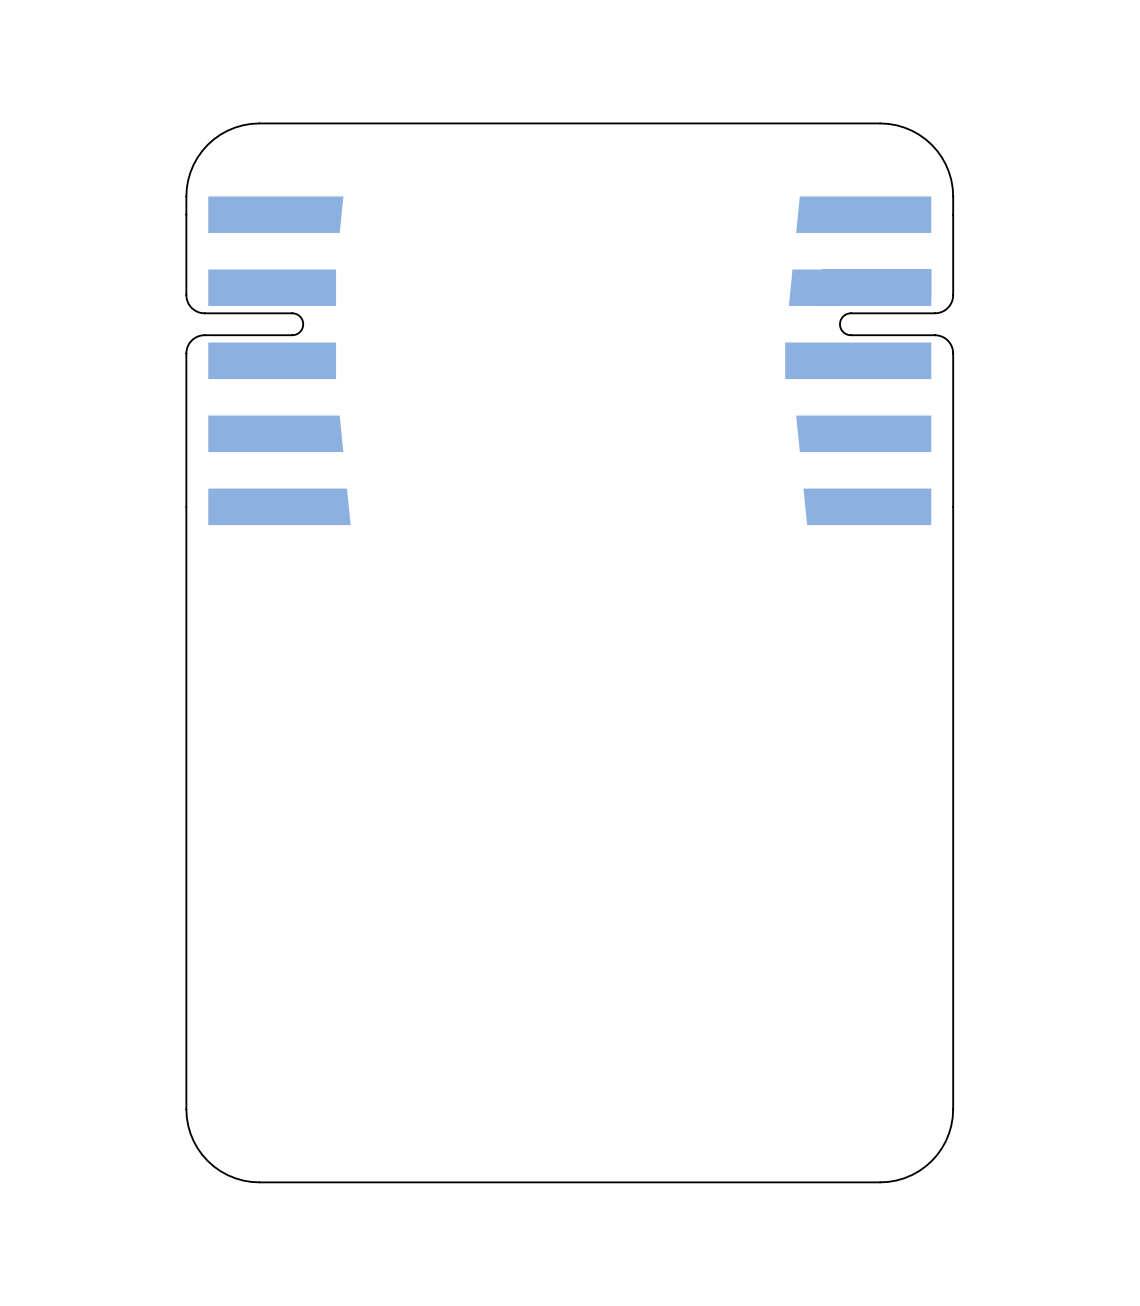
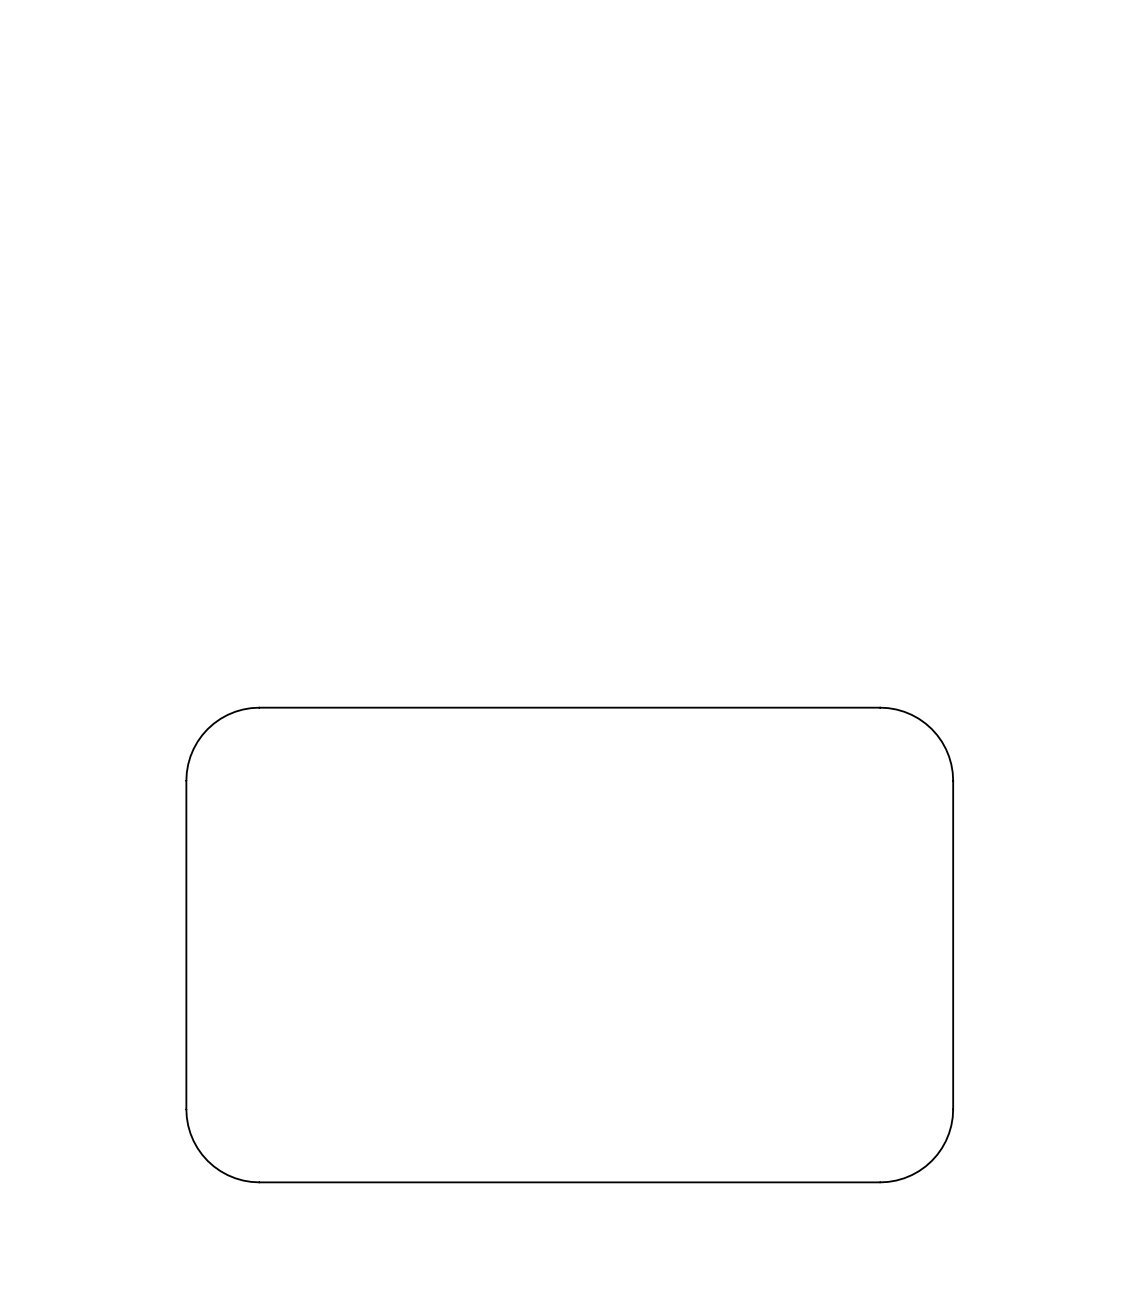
board edge: (953, 214) (951, 180) (945, 164) (937, 150) (925, 139) (911, 130) (896, 125) (880, 123) (251, 123) (235, 127) (220, 134) (202, 150) (193, 164) (188, 180) (186, 214) -> none
part: (268, 360) -> none
part: (869, 360) -> none
board edge: (186, 506) (186, 780) -> none
board edge: (953, 506) (953, 780) -> (186, 780) (188, 764) (193, 749) (207, 729) (220, 718) (235, 711) (259, 707) (888, 708) (911, 714) (931, 729) (945, 749) (951, 764) (953, 780)

